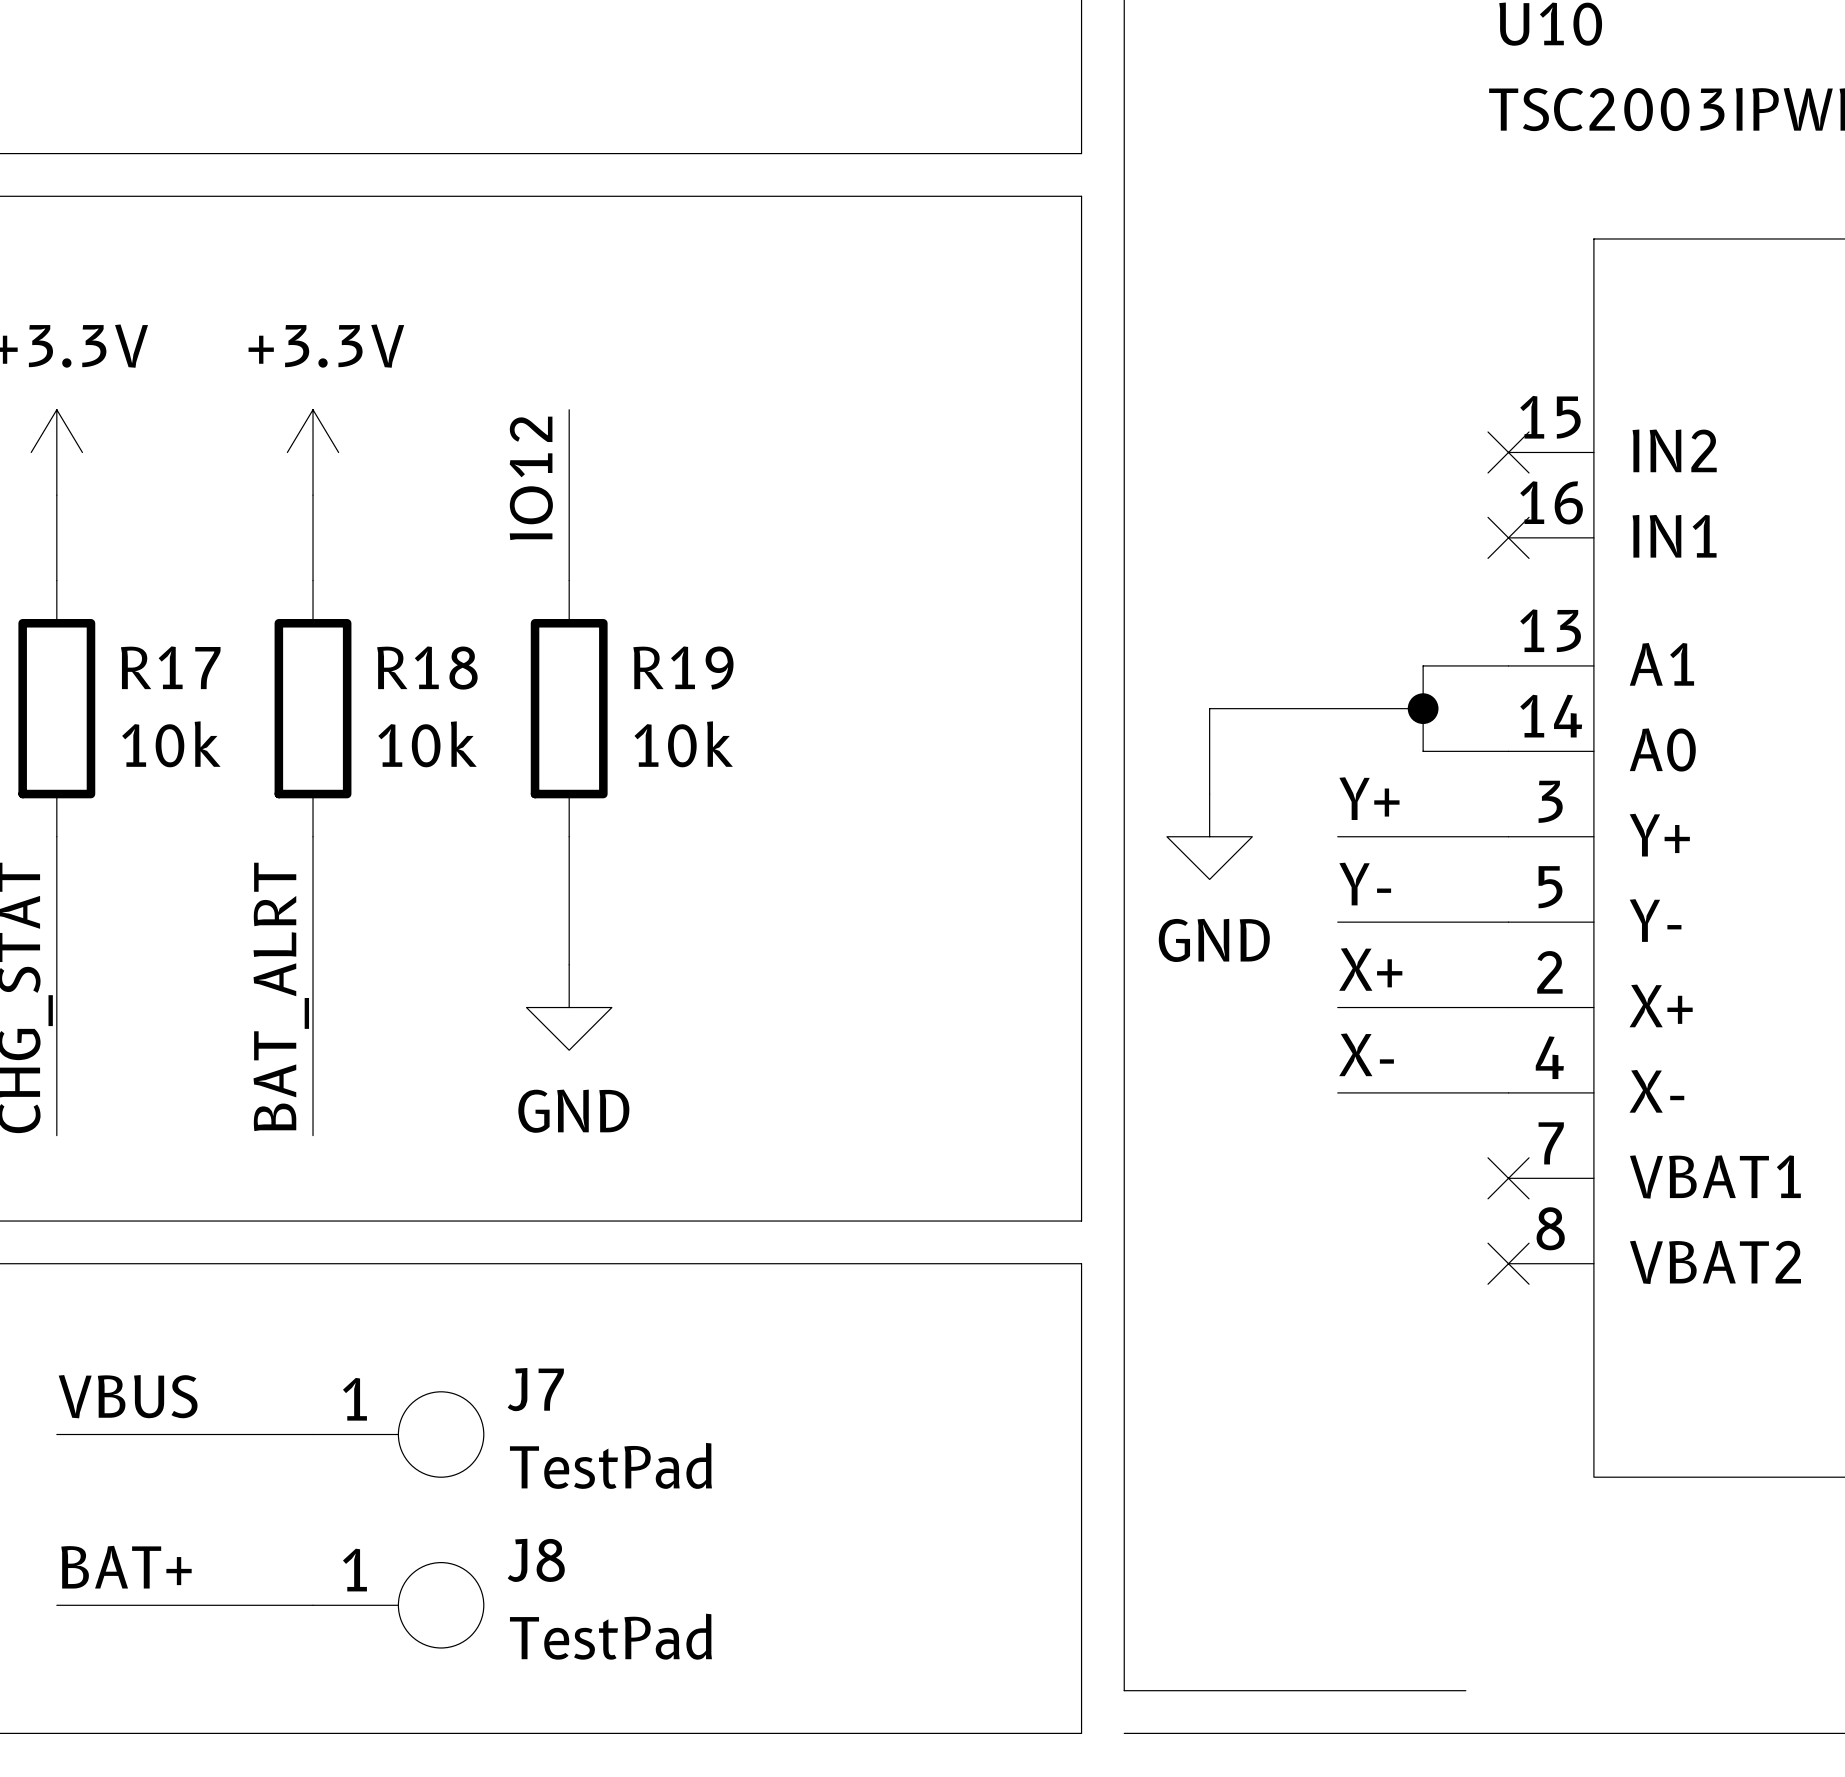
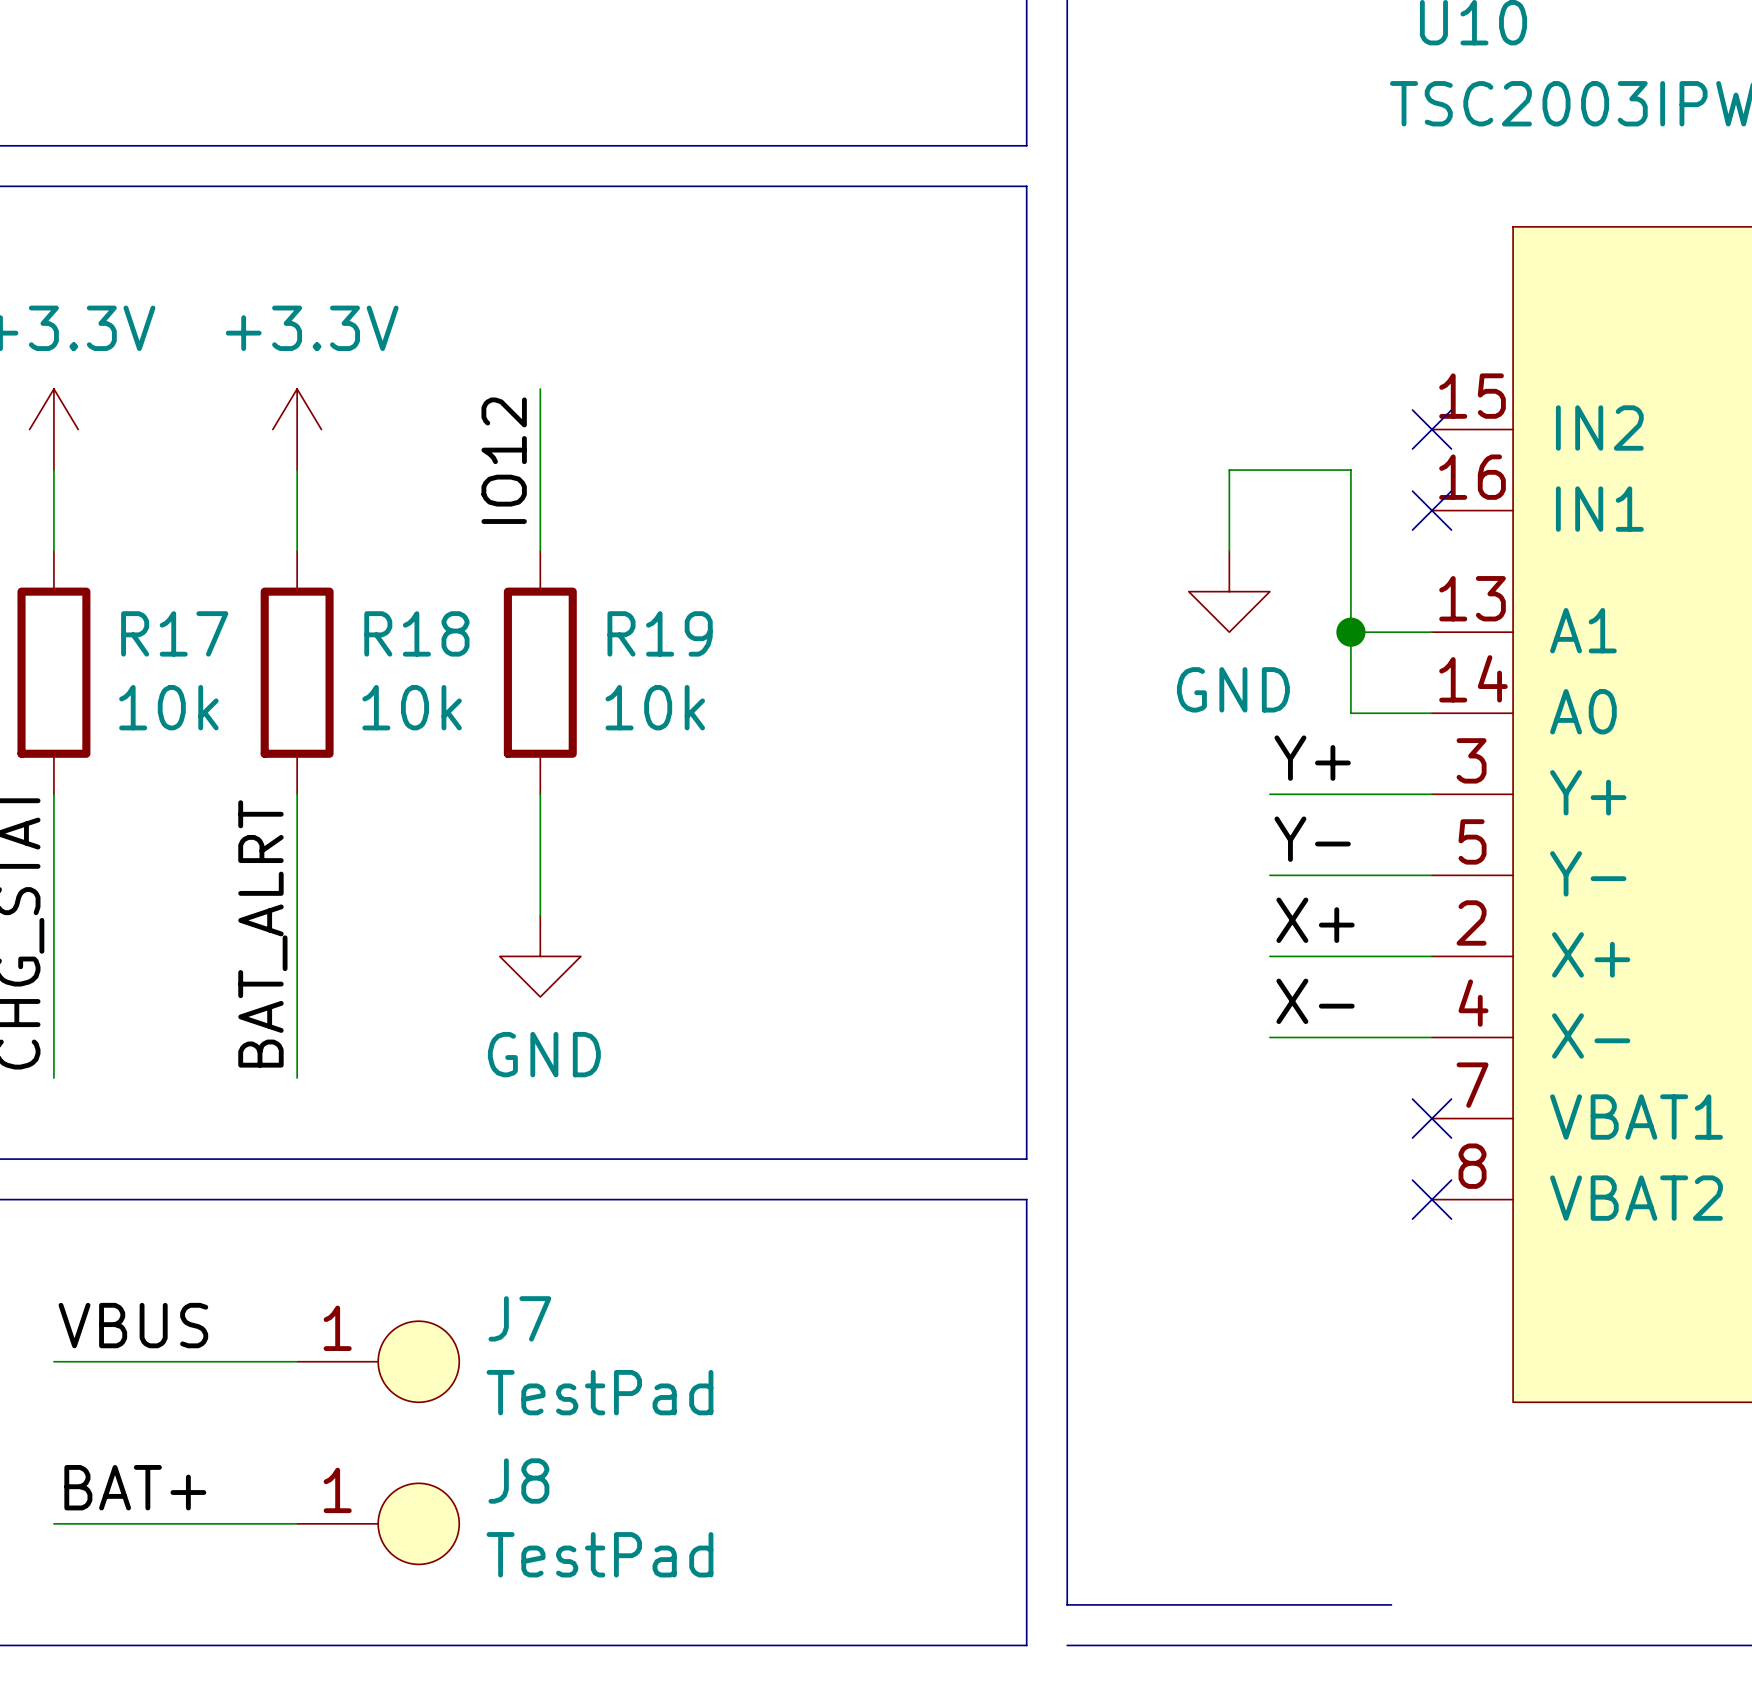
wire: none -> (1229, 551) (1229, 470) (1350, 470) (1350, 632)
wire: (1423, 708) (1209, 708) (1209, 794) -> none
junction position: (1423, 708) -> (1350, 632)
power symbol position: GND (1209, 836) -> GND (1229, 591)

